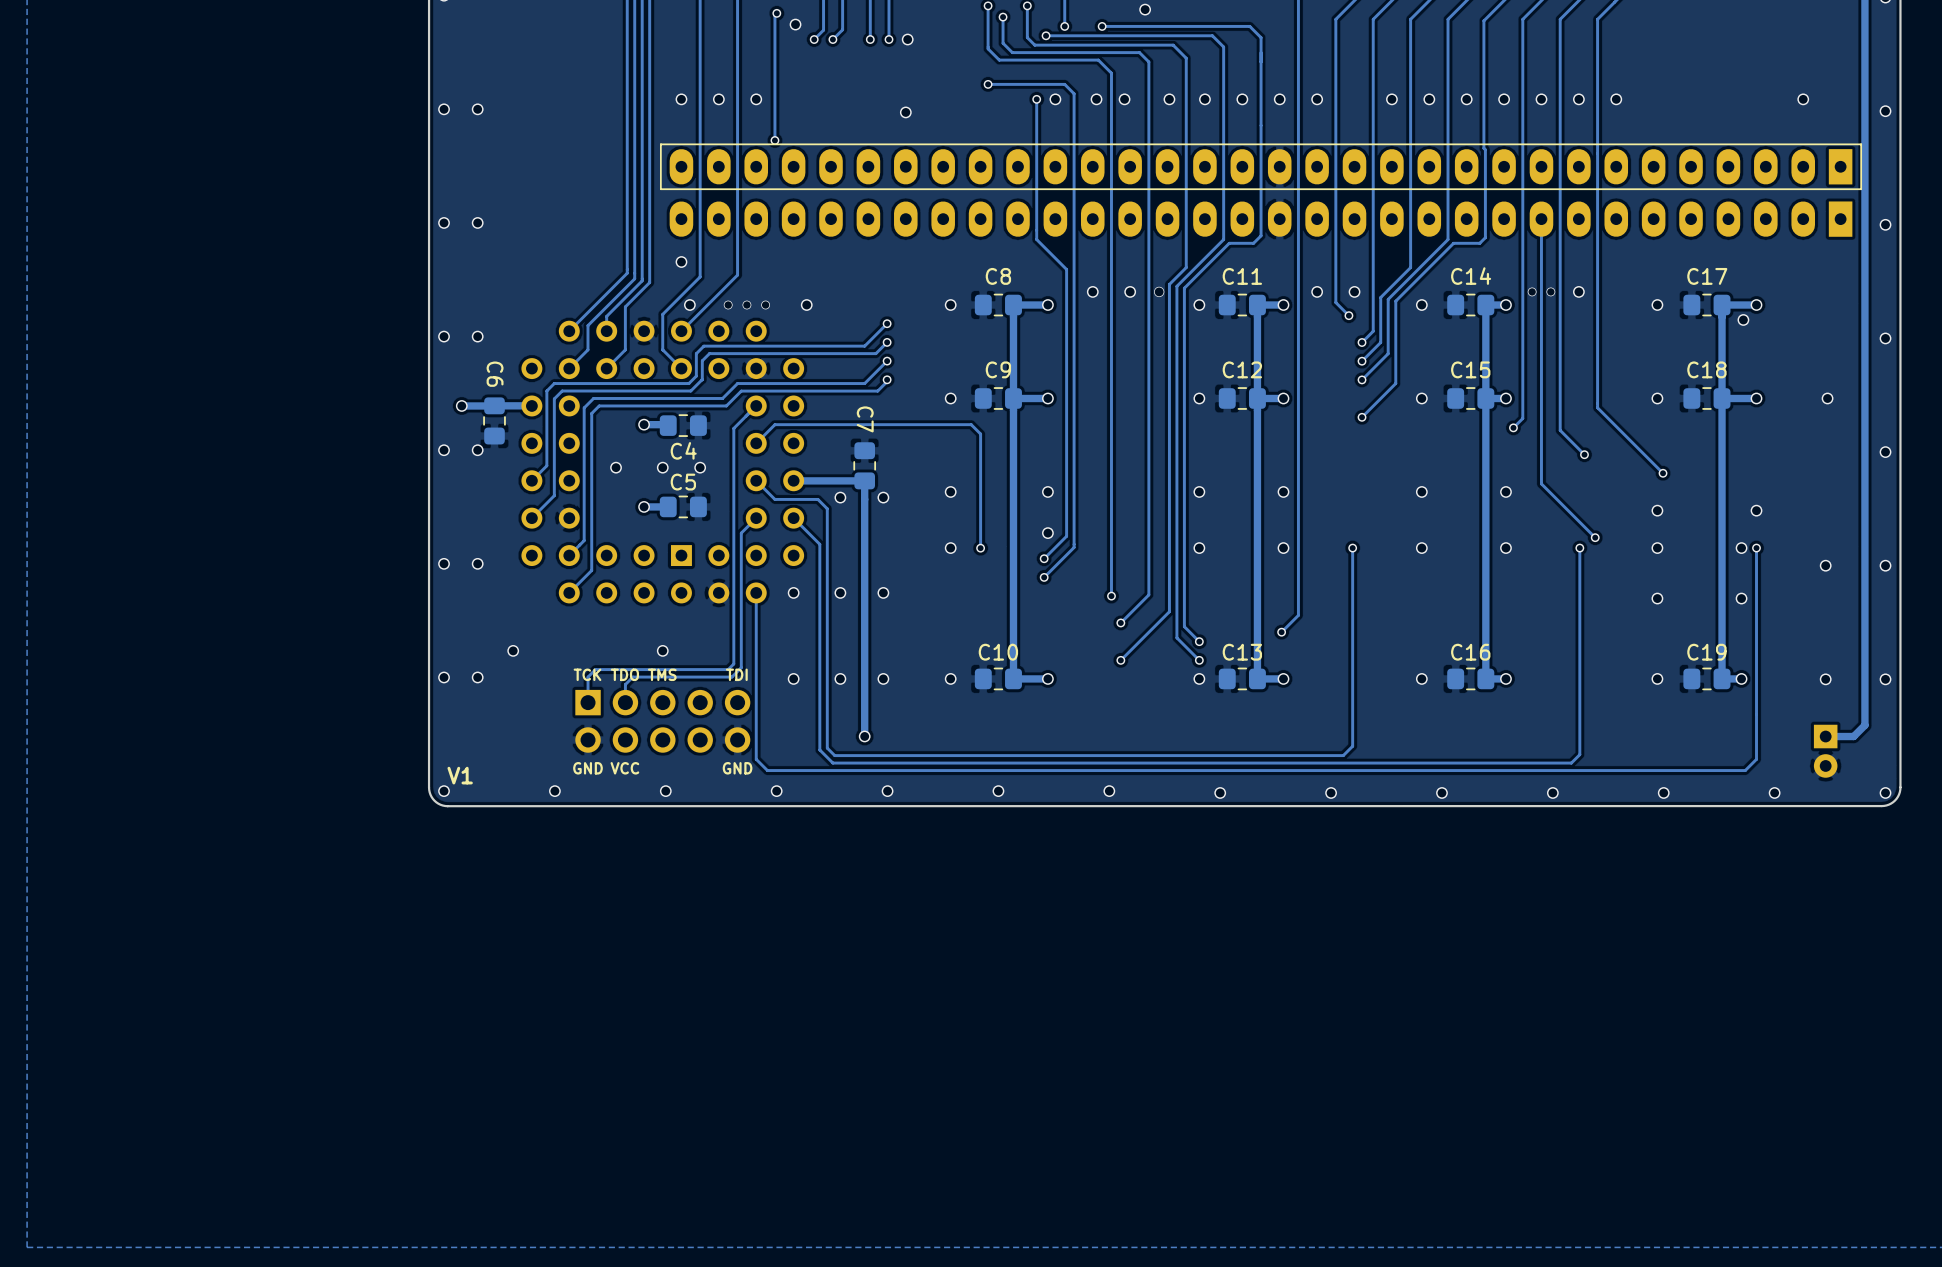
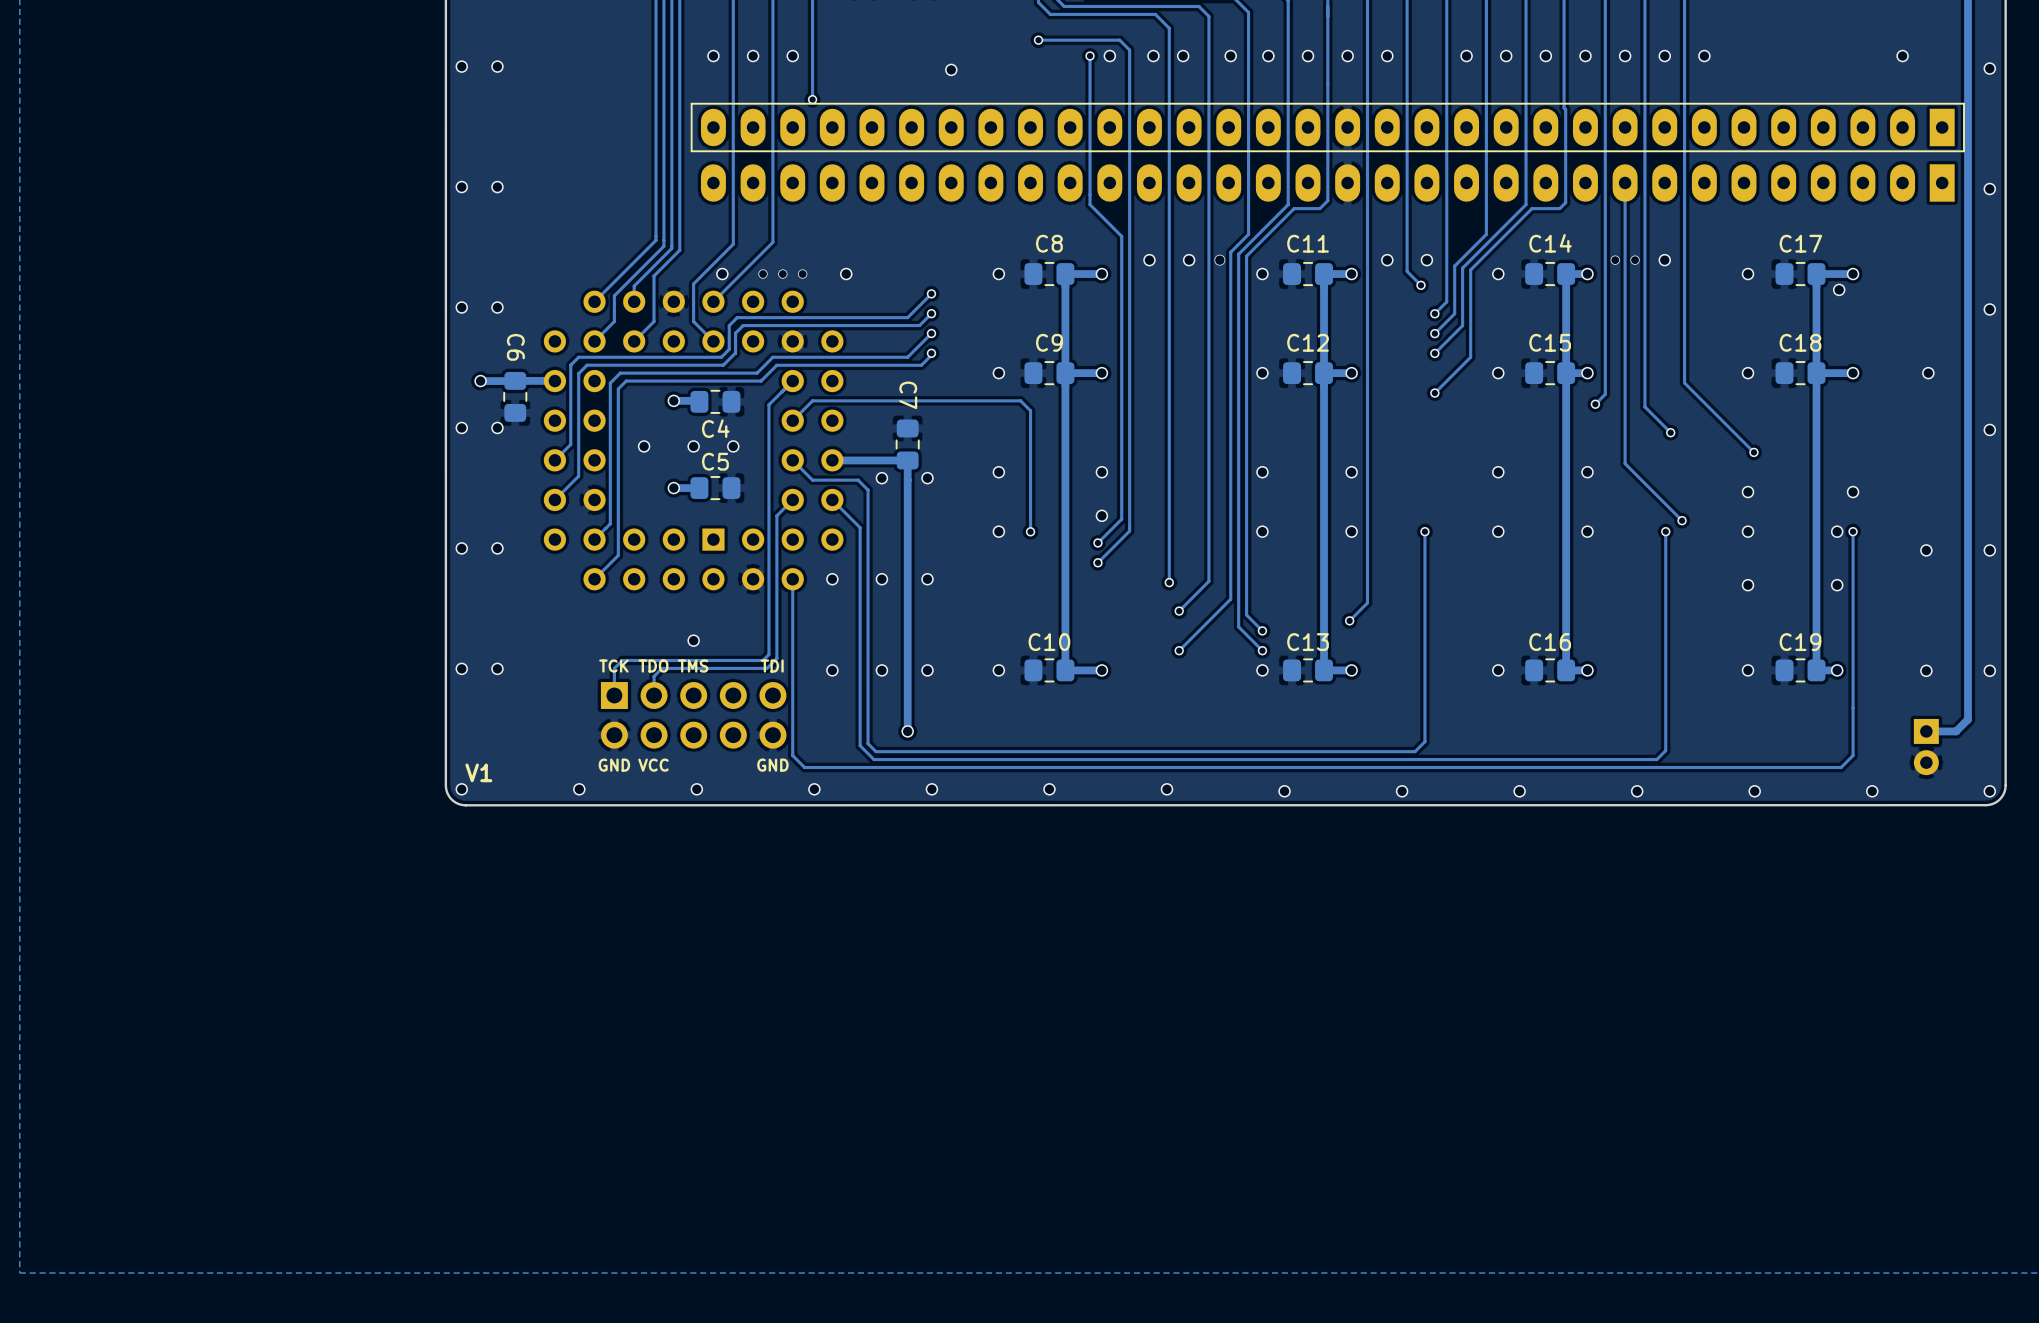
via: (681, 262) -> none
via: (513, 650) -> none

